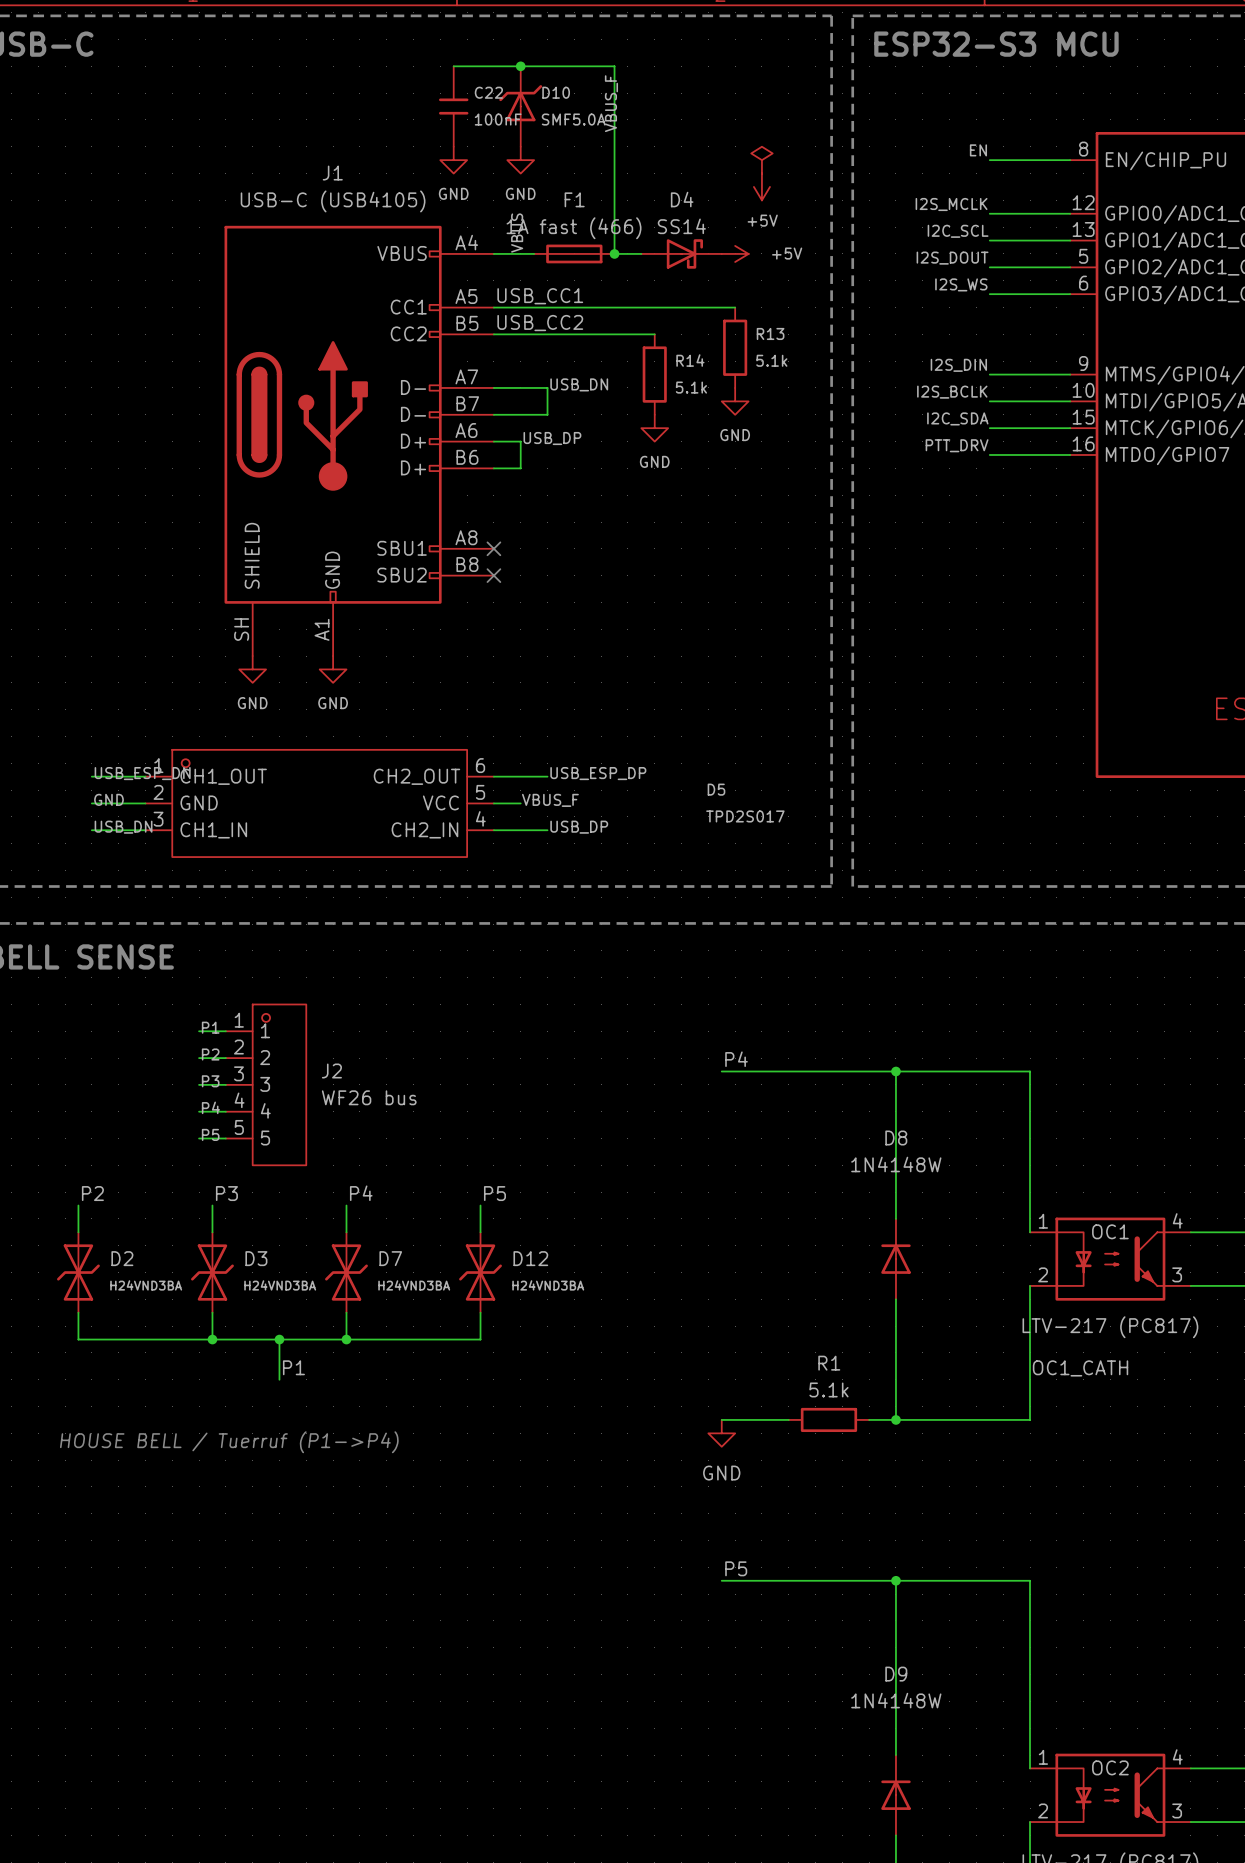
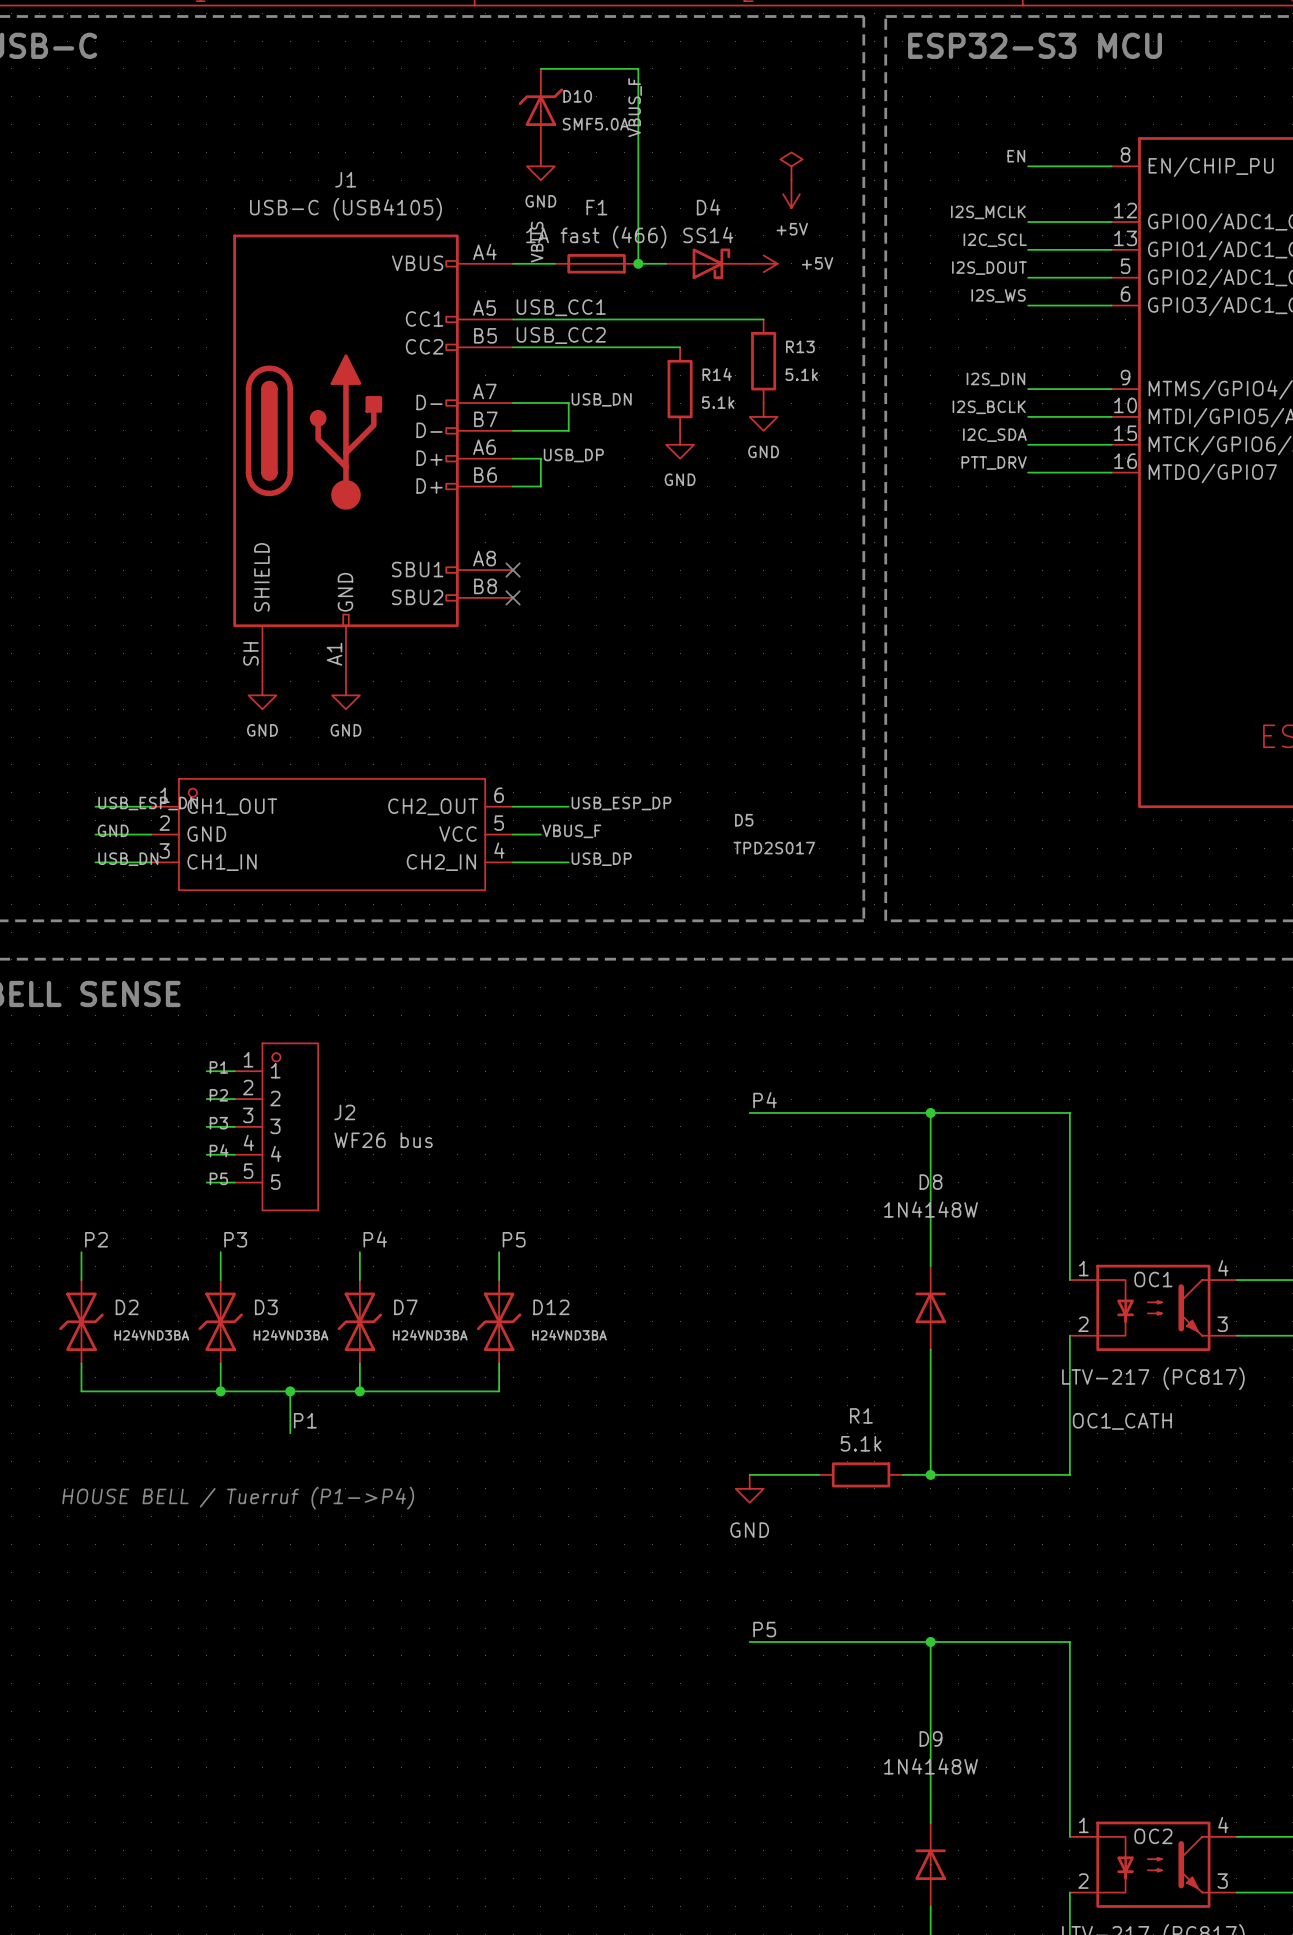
wire: (453, 66) (520, 66) -> none
junction: (520, 66) -> none
C22: 100nF (453, 106) -> none
power symbol: GND (453, 160) -> none

